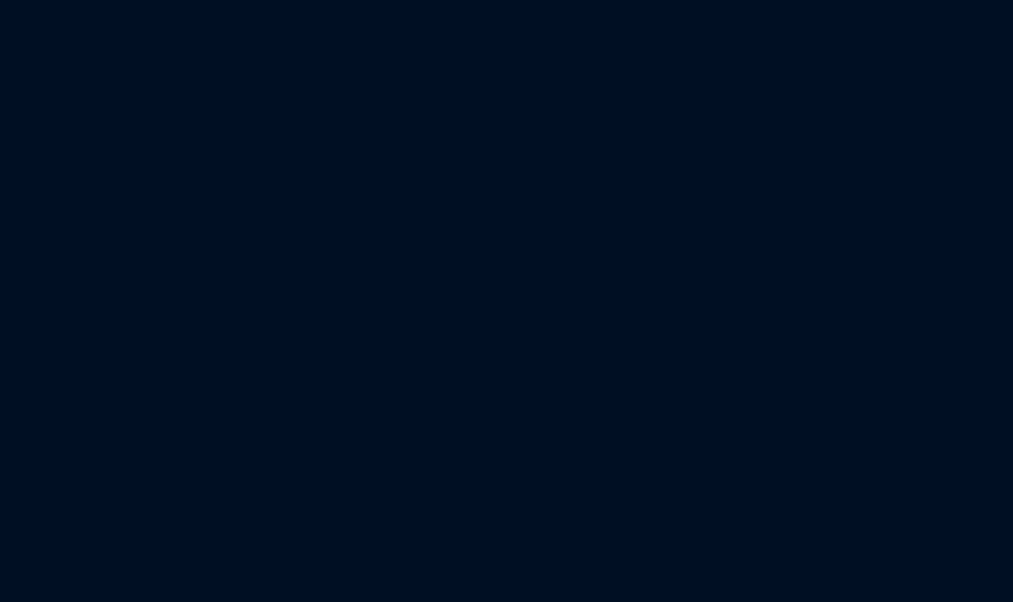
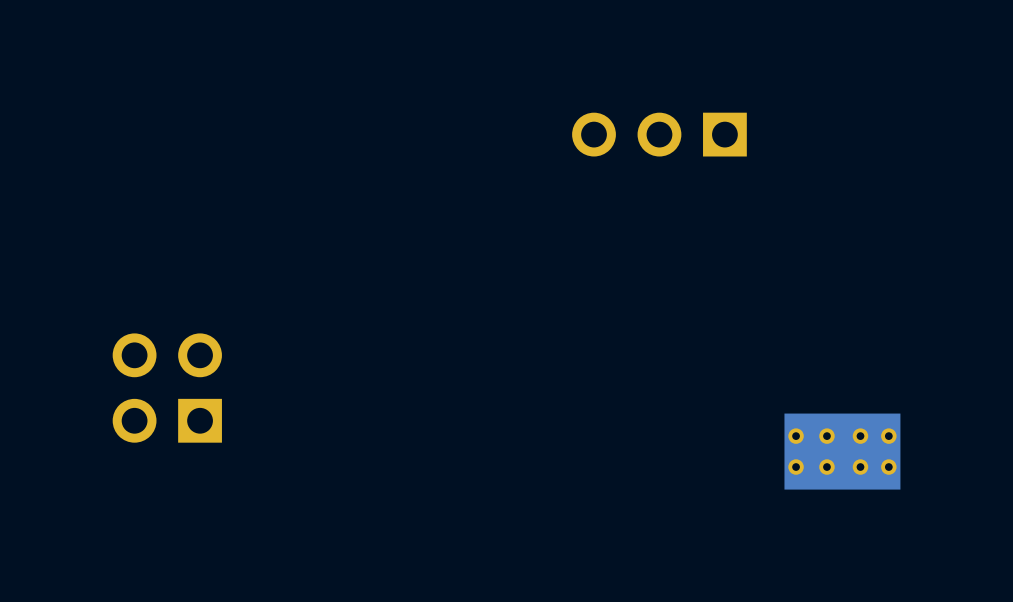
part: none -> (659, 134)
part: none -> (167, 388)
part: none -> (842, 451)

